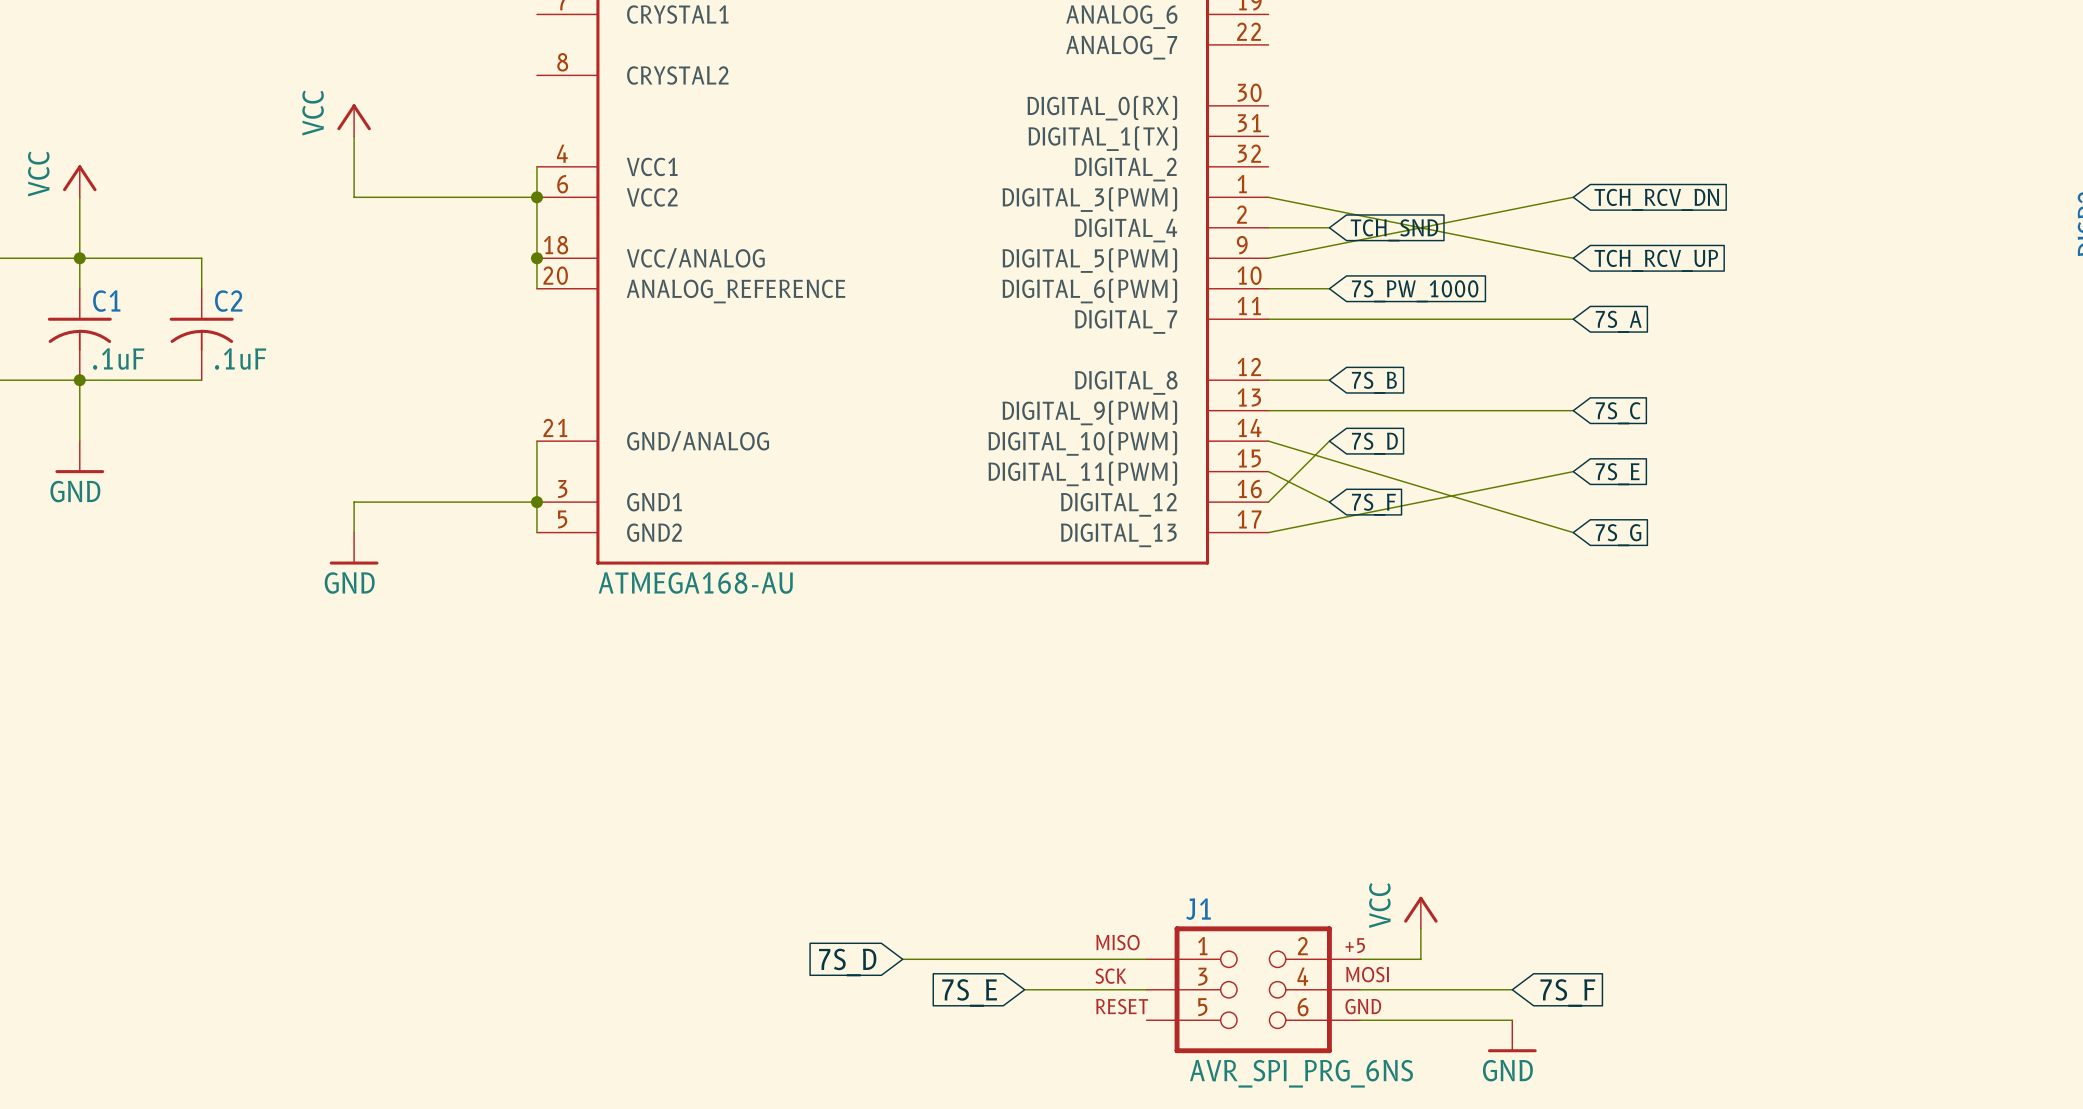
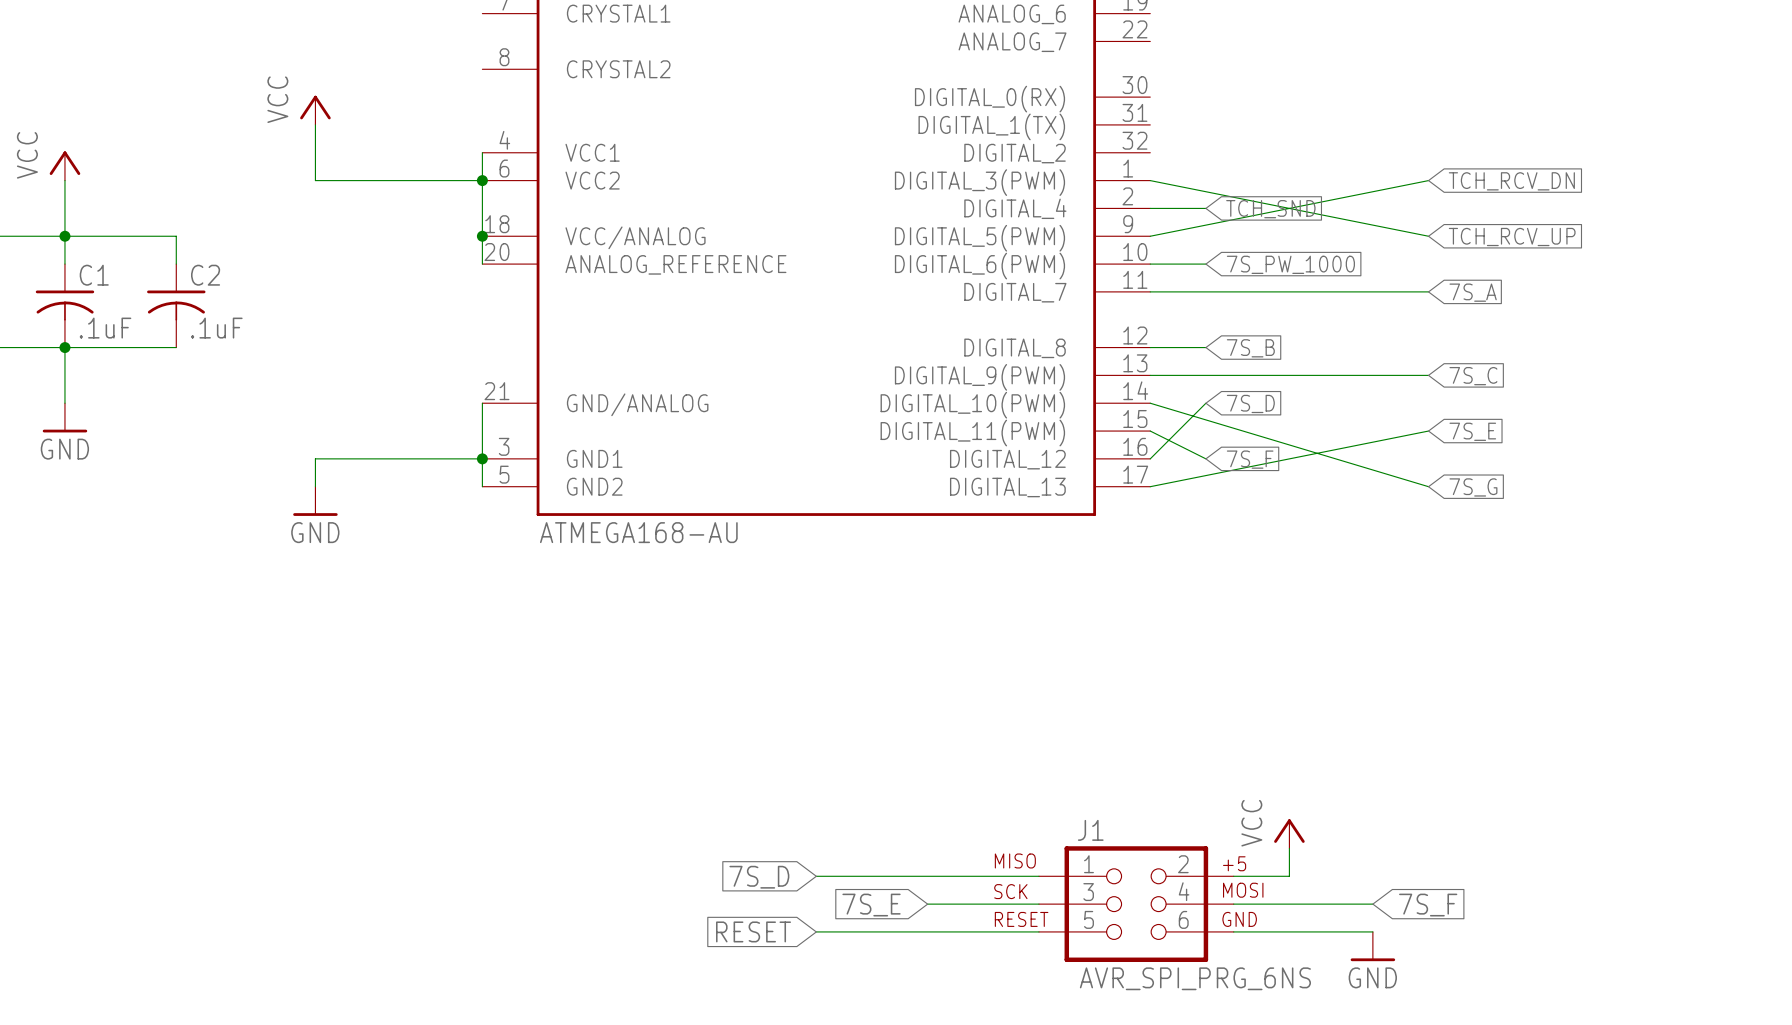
global label: none -> RESET (753, 931)
wire: none -> (816, 931) (1038, 931)

